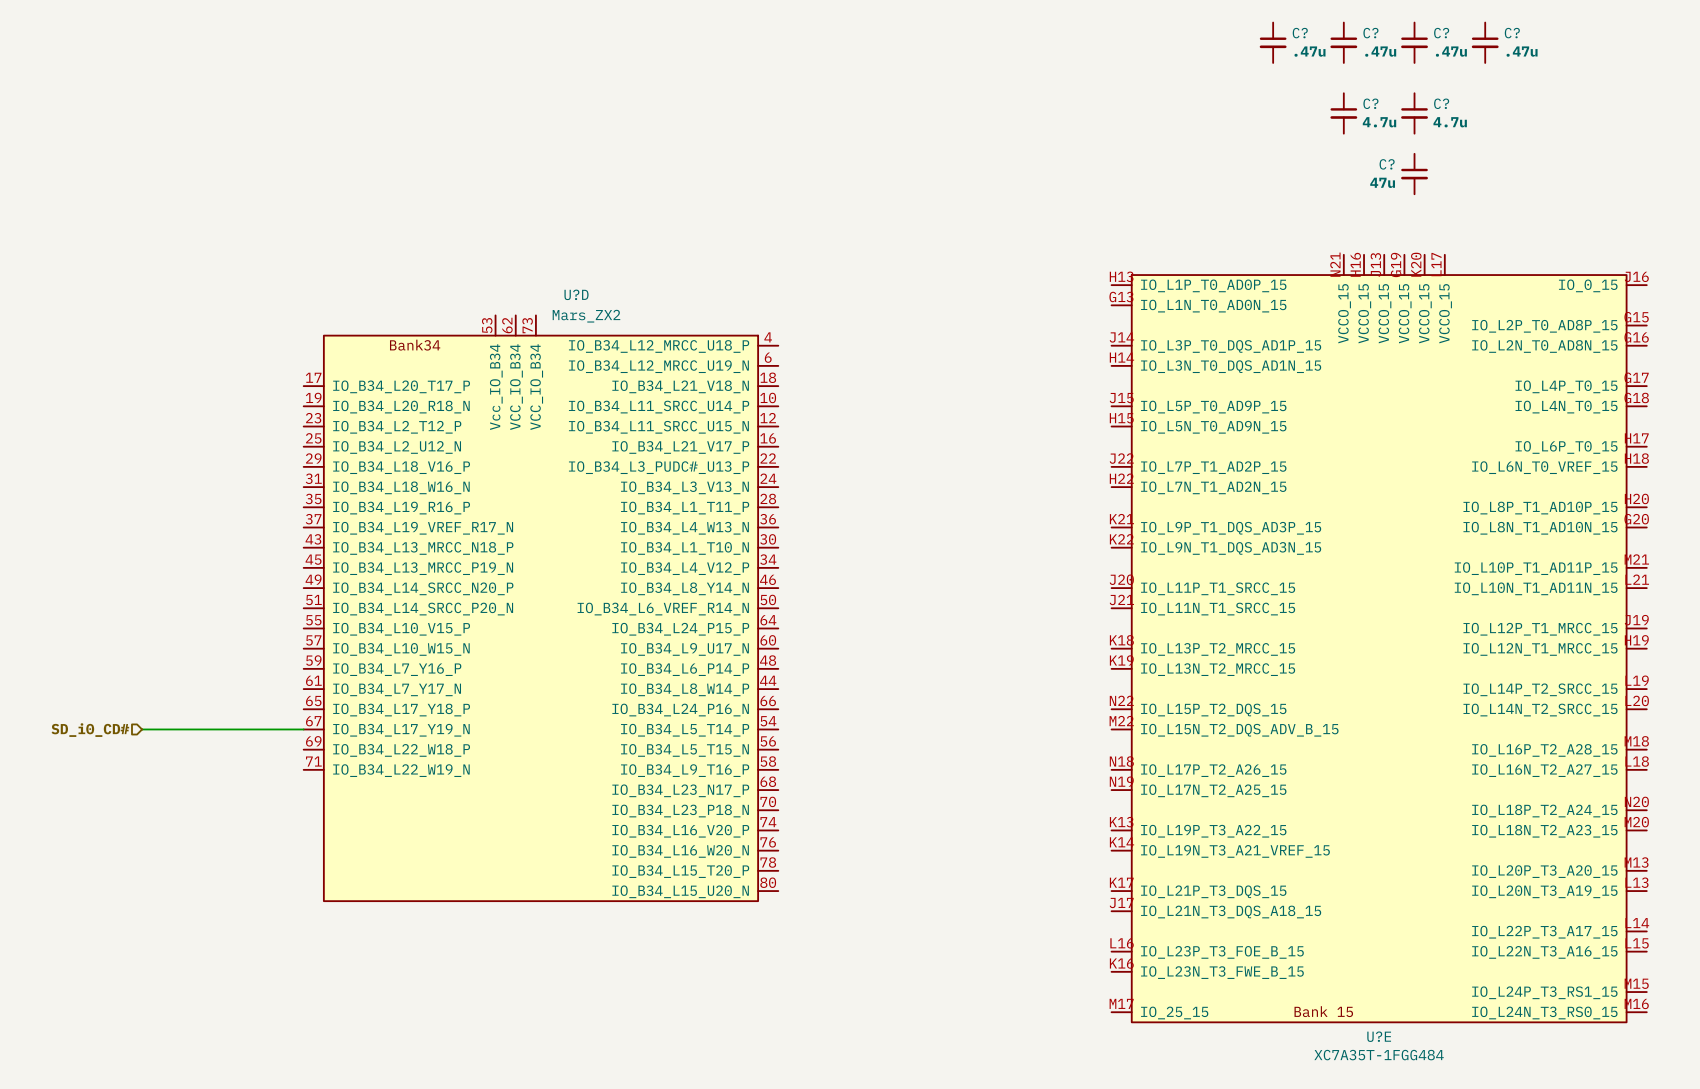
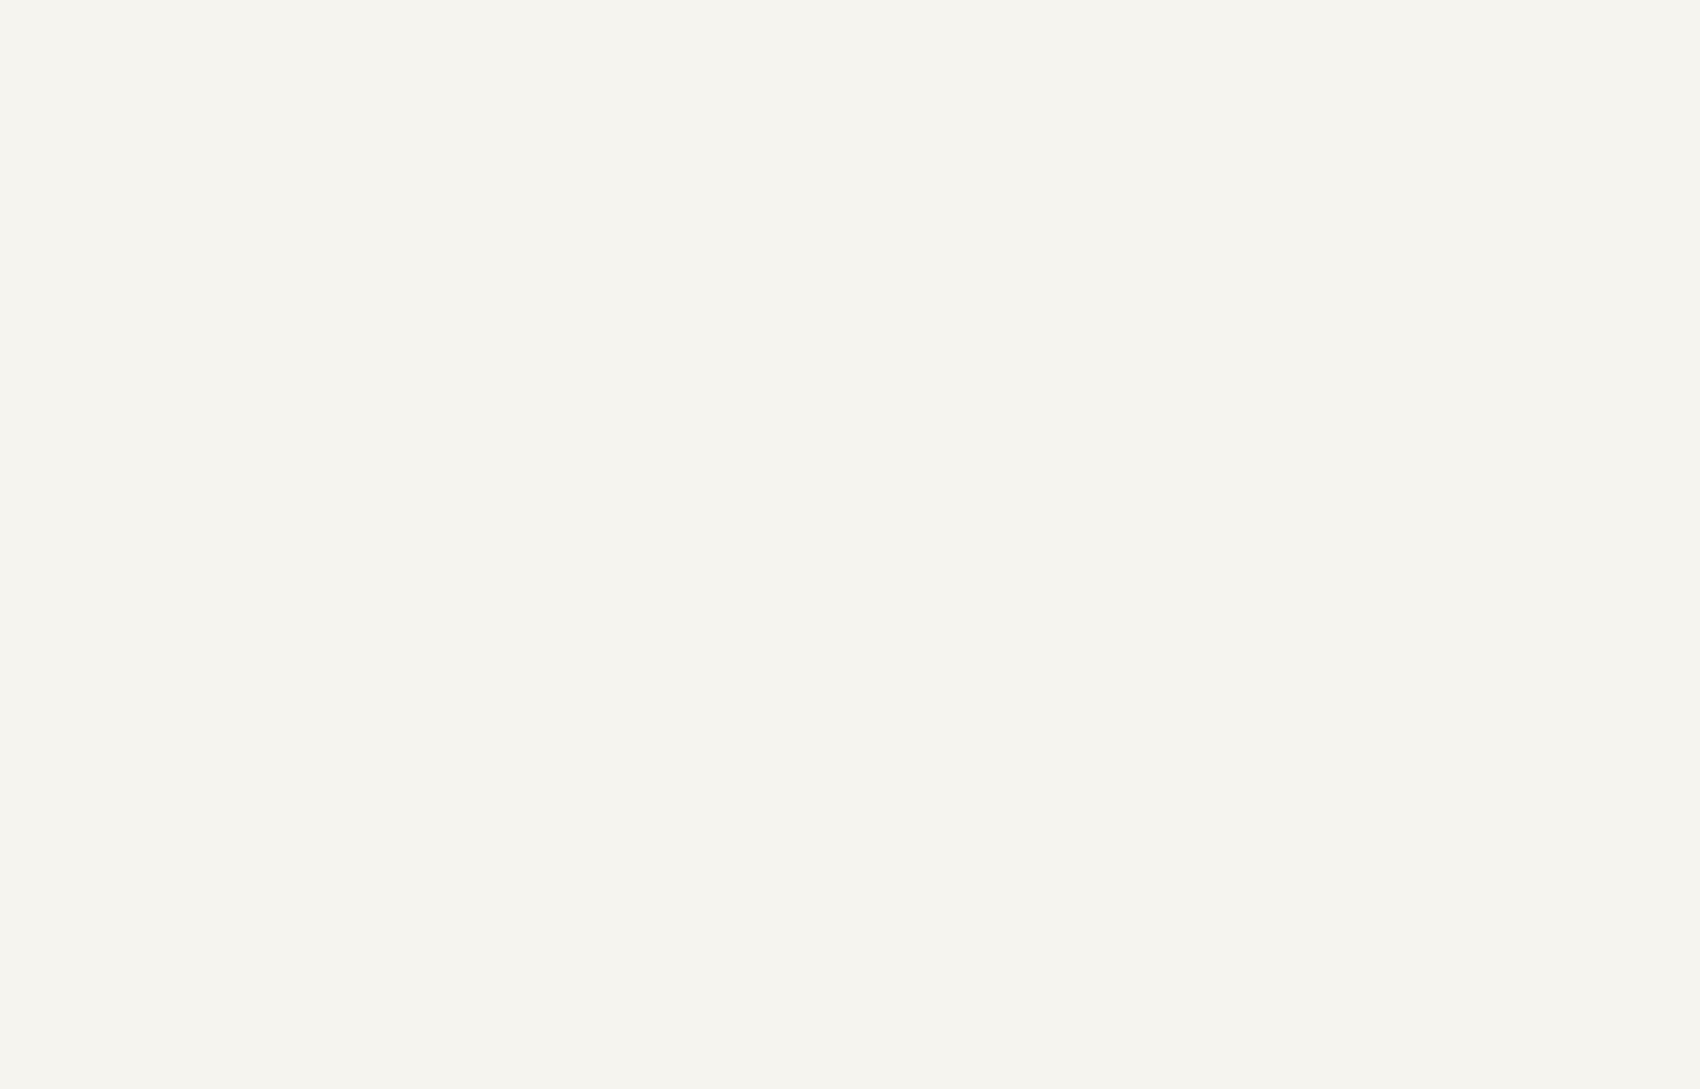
C?: .47u (1273, 42) -> none
C?: .47u (1343, 42) -> none
C?: .47u (1414, 42) -> none
C?: .47u (1485, 42) -> none
C?: 4.7u (1343, 113) -> none
C?: 4.7u (1414, 113) -> none
C?: 47u (1414, 174) -> none
U?D: Mars_ZX2 (540, 608) -> none
U?E: XC7A35T-1FGG484 (1379, 638) -> none
wire: (142, 729) (303, 729) -> none
hierarchical label: SD_i0_CD# (90, 730) -> none

